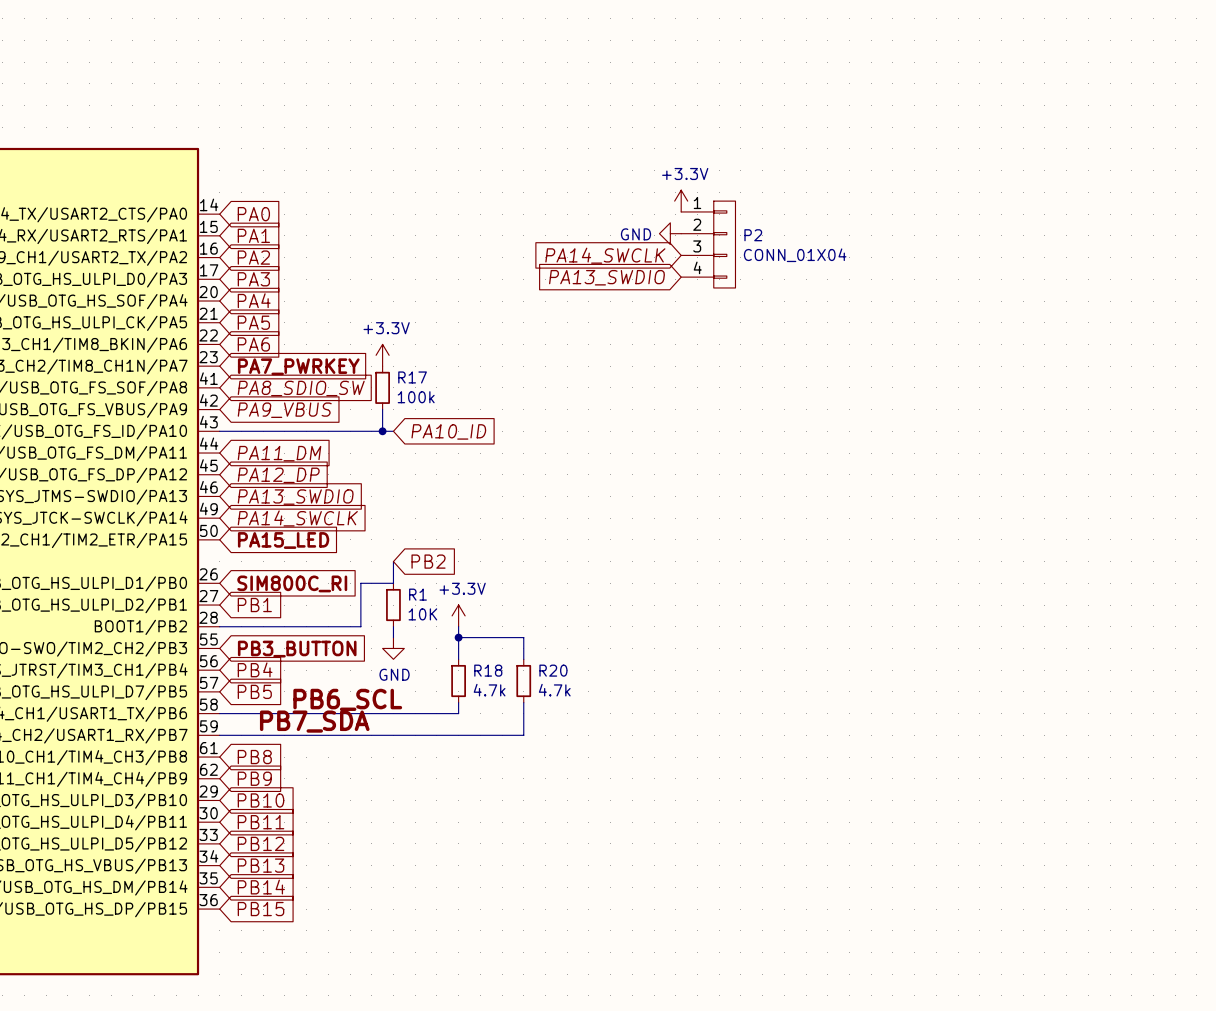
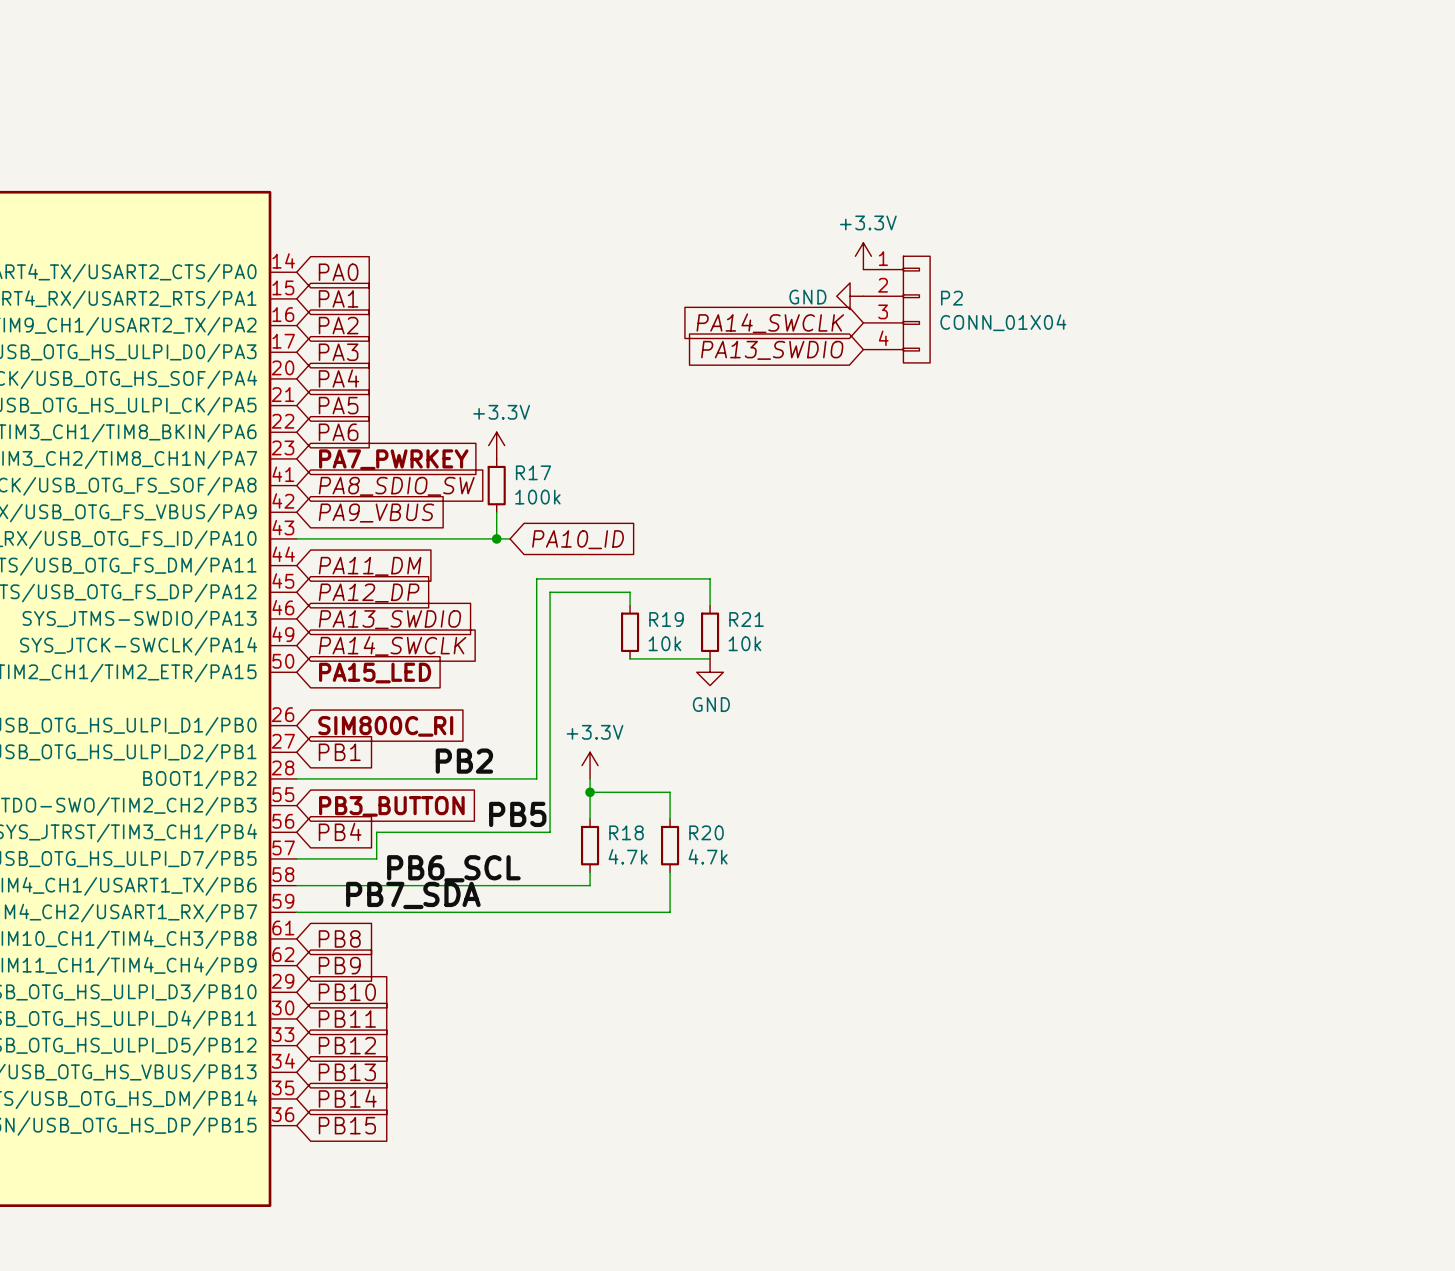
wire: none -> (630, 605) (630, 592) (550, 592) (550, 832) (376, 832) (376, 858) (296, 858)
R19: none -> 10k (630, 632)
R21: none -> 10k (710, 632)
wire: none -> (630, 658) (710, 658)
wire: (393, 561) (393, 583) (360, 583) (360, 626) -> (710, 605) (710, 578) (536, 578) (536, 778) (470, 778)
global label: PB2 (428, 561) -> none
R1: 10K (393, 605) -> none
label: none -> PB2 (464, 761)
wire: (393, 626) (393, 637) -> none
power symbol position: GND (393, 648) -> GND (710, 672)
label: none -> PB5 (517, 814)
global label: PB5 (254, 691) -> none

